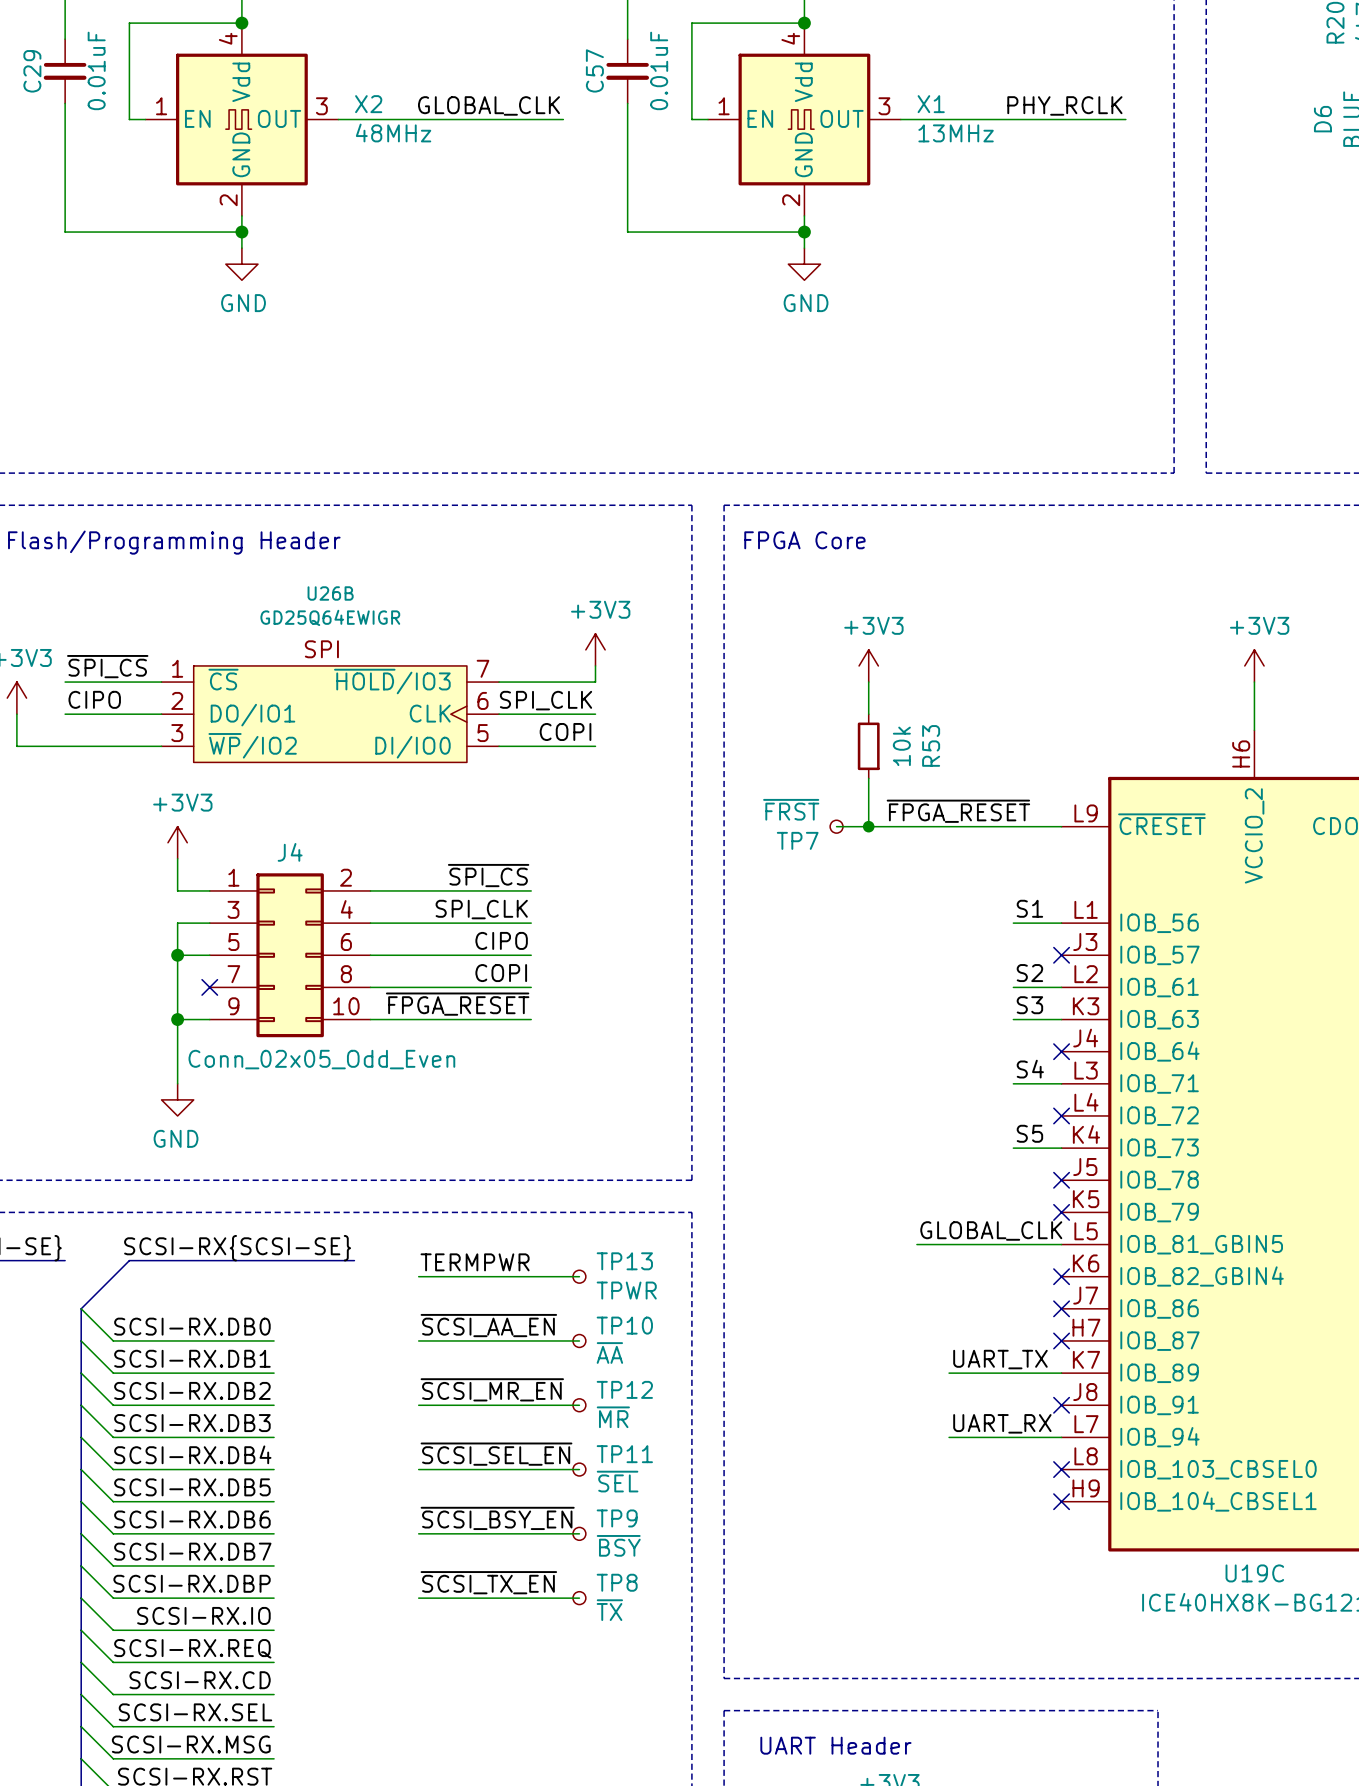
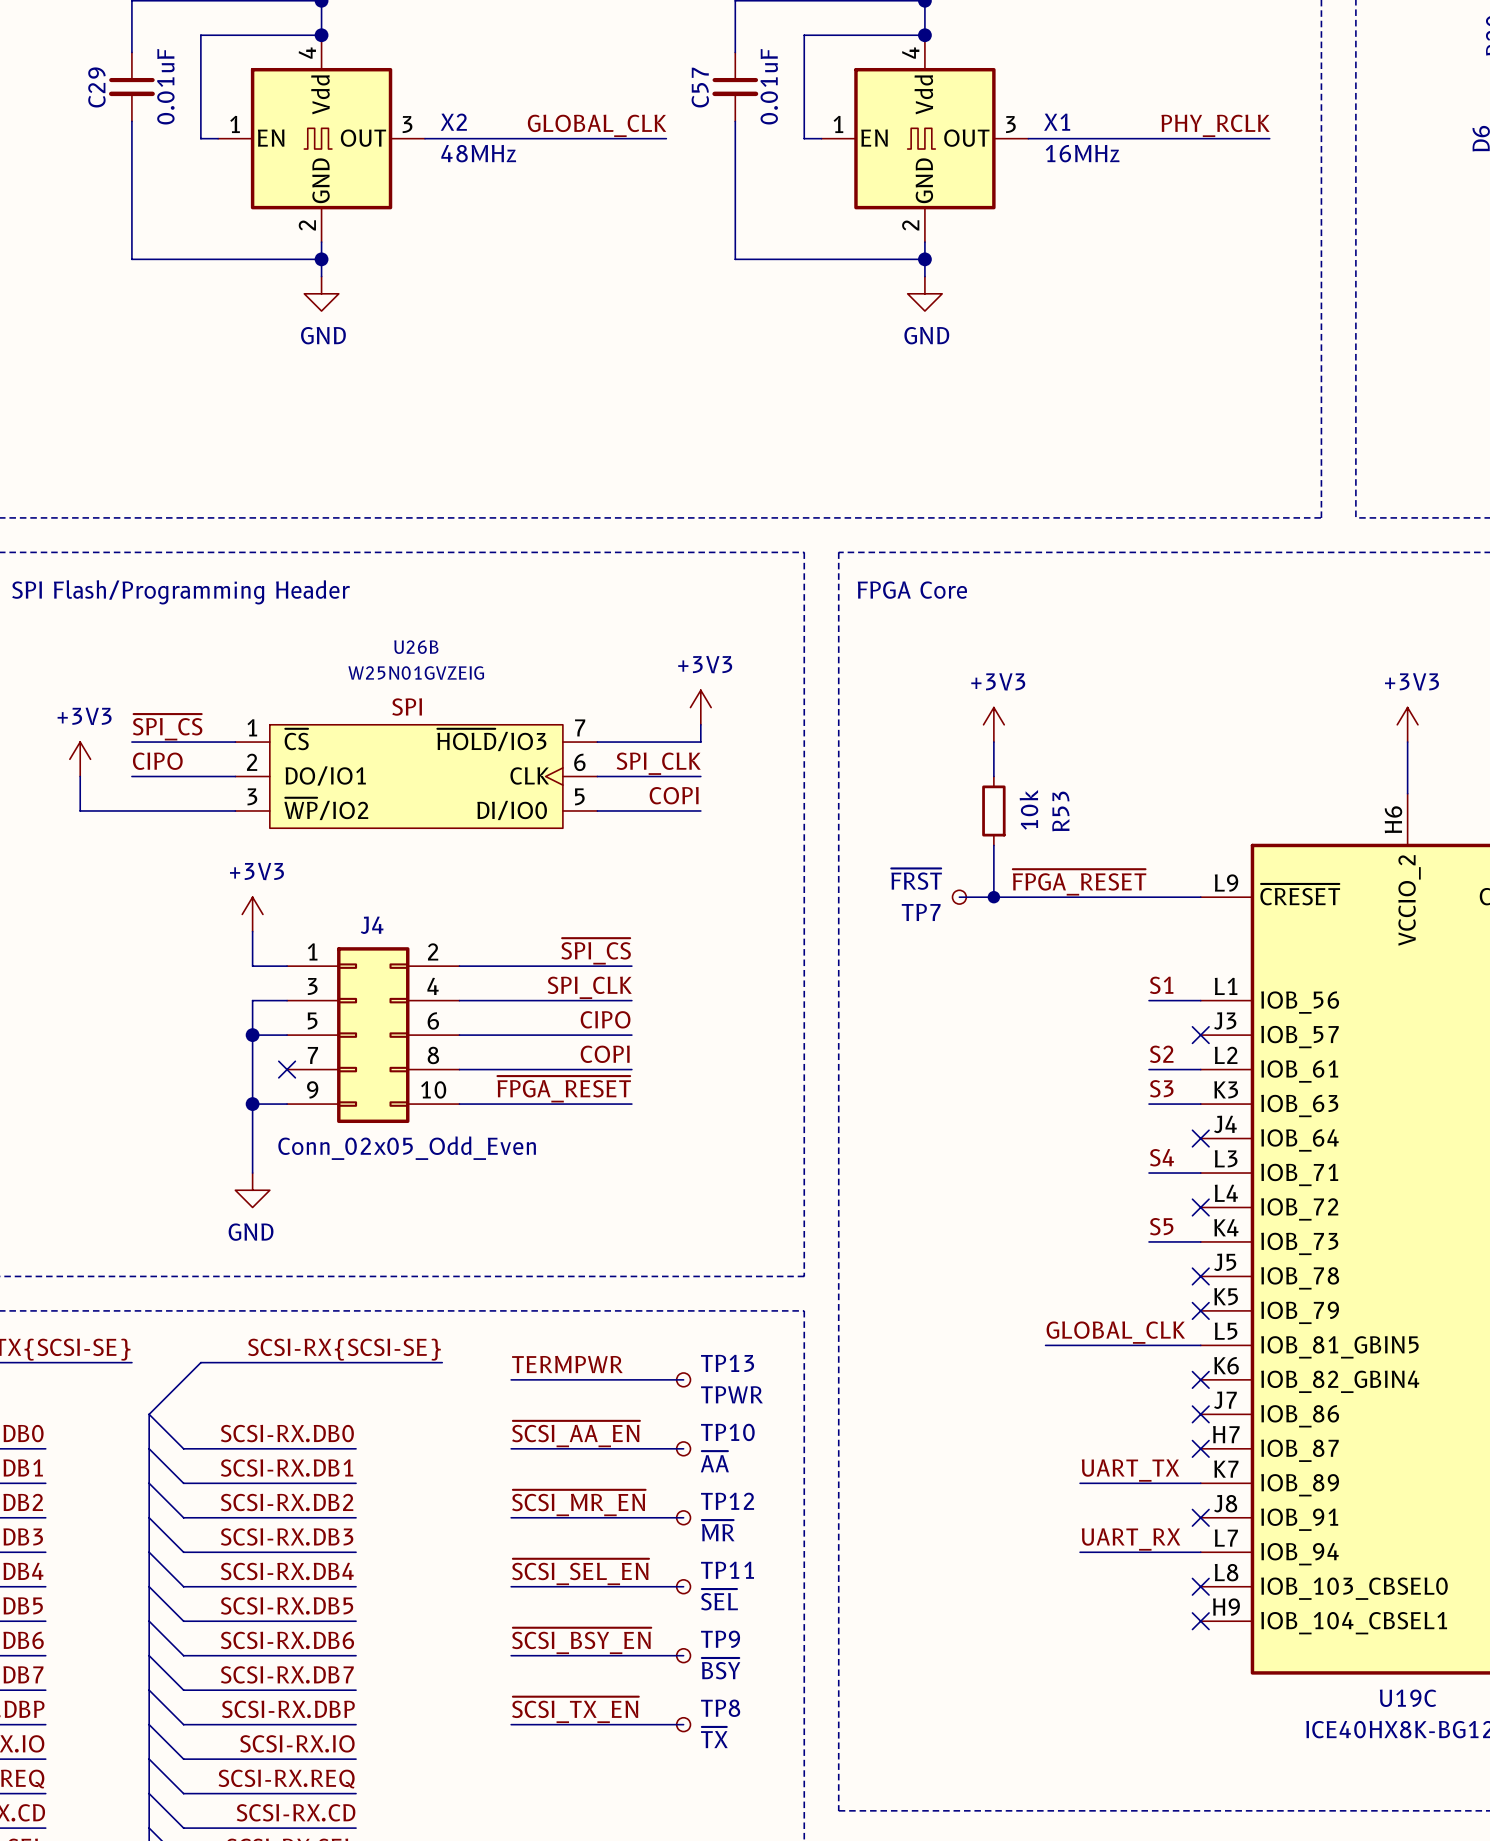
X1 value: 13MHz (956, 133) -> 16MHz (1082, 153)
U26B value: GD25Q64EWIGR (330, 617) -> W25N01GVZEIG (416, 673)

